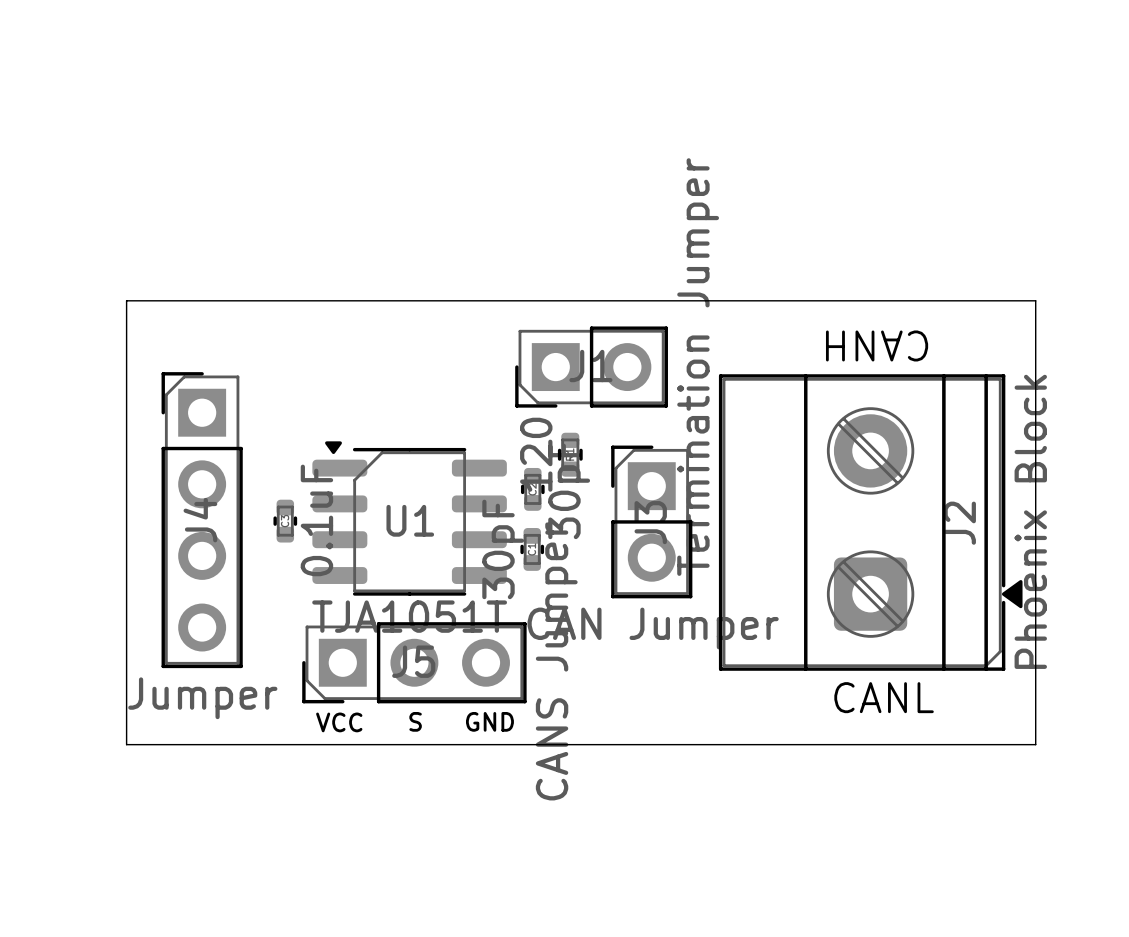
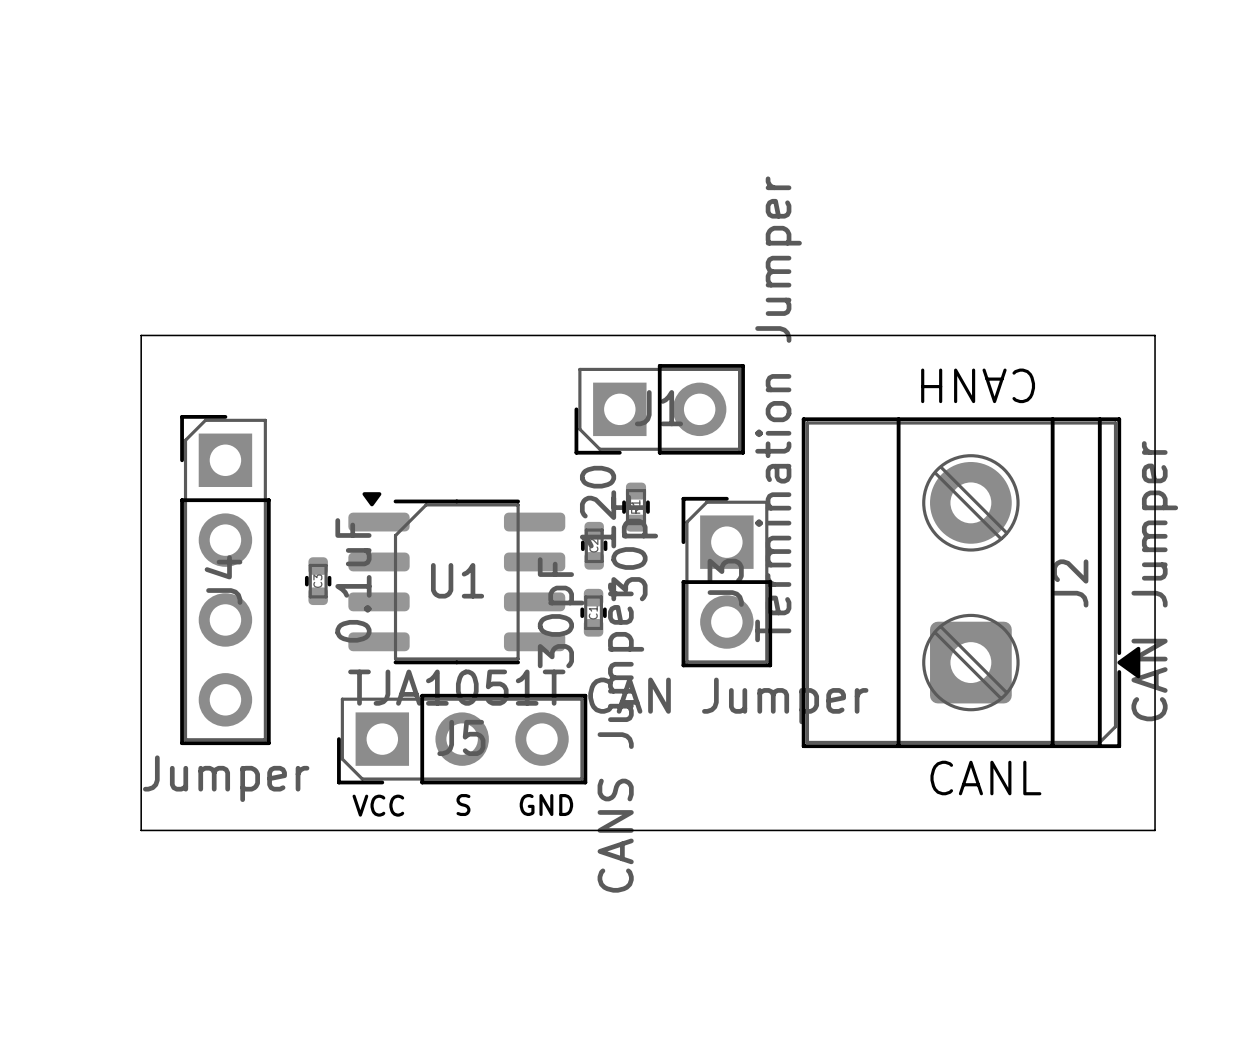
J2 value: Phoenix Block (1030, 521) -> CAN Jumper (1154, 581)

